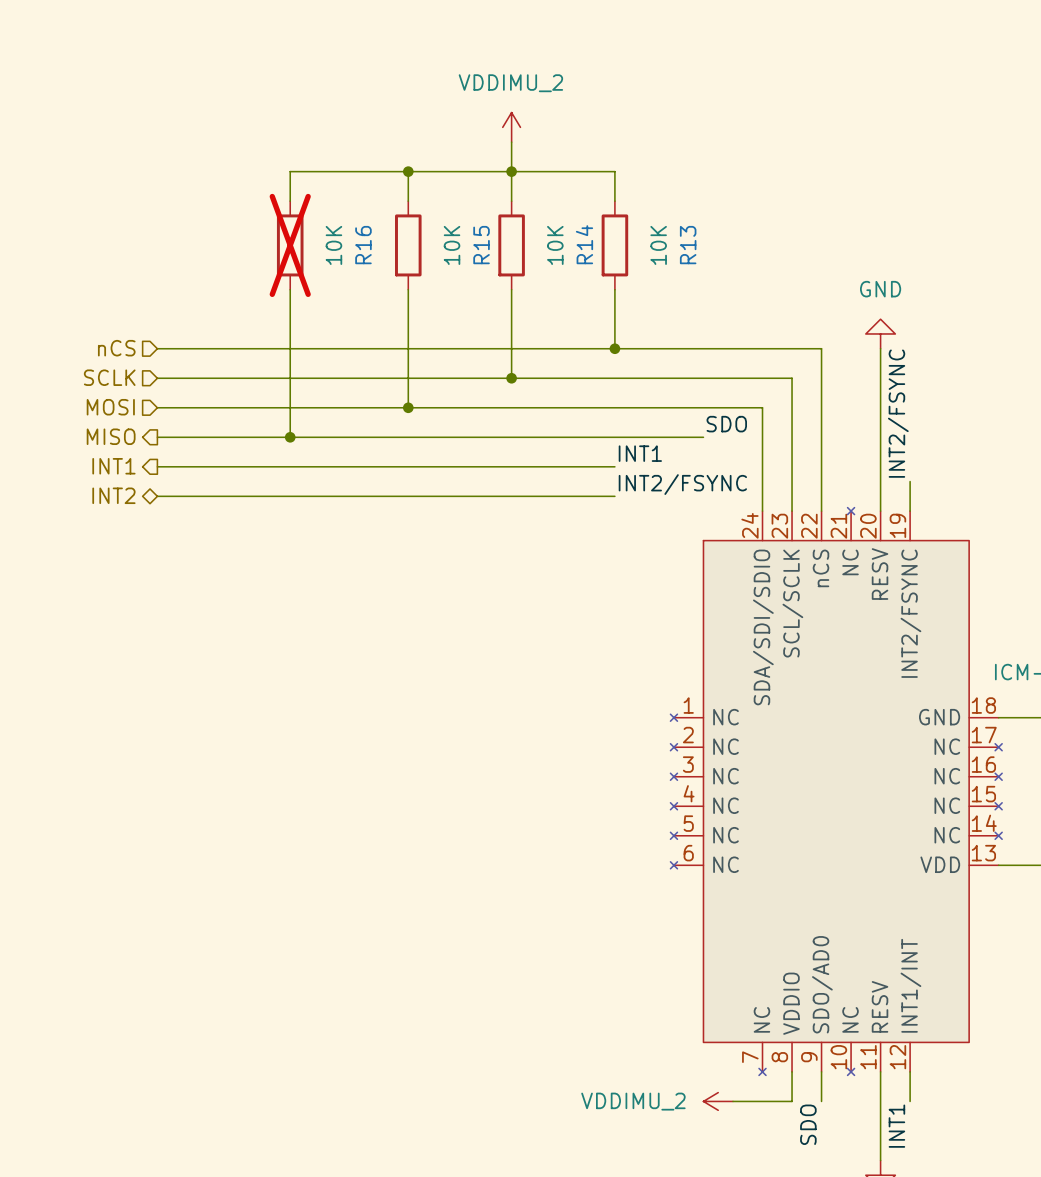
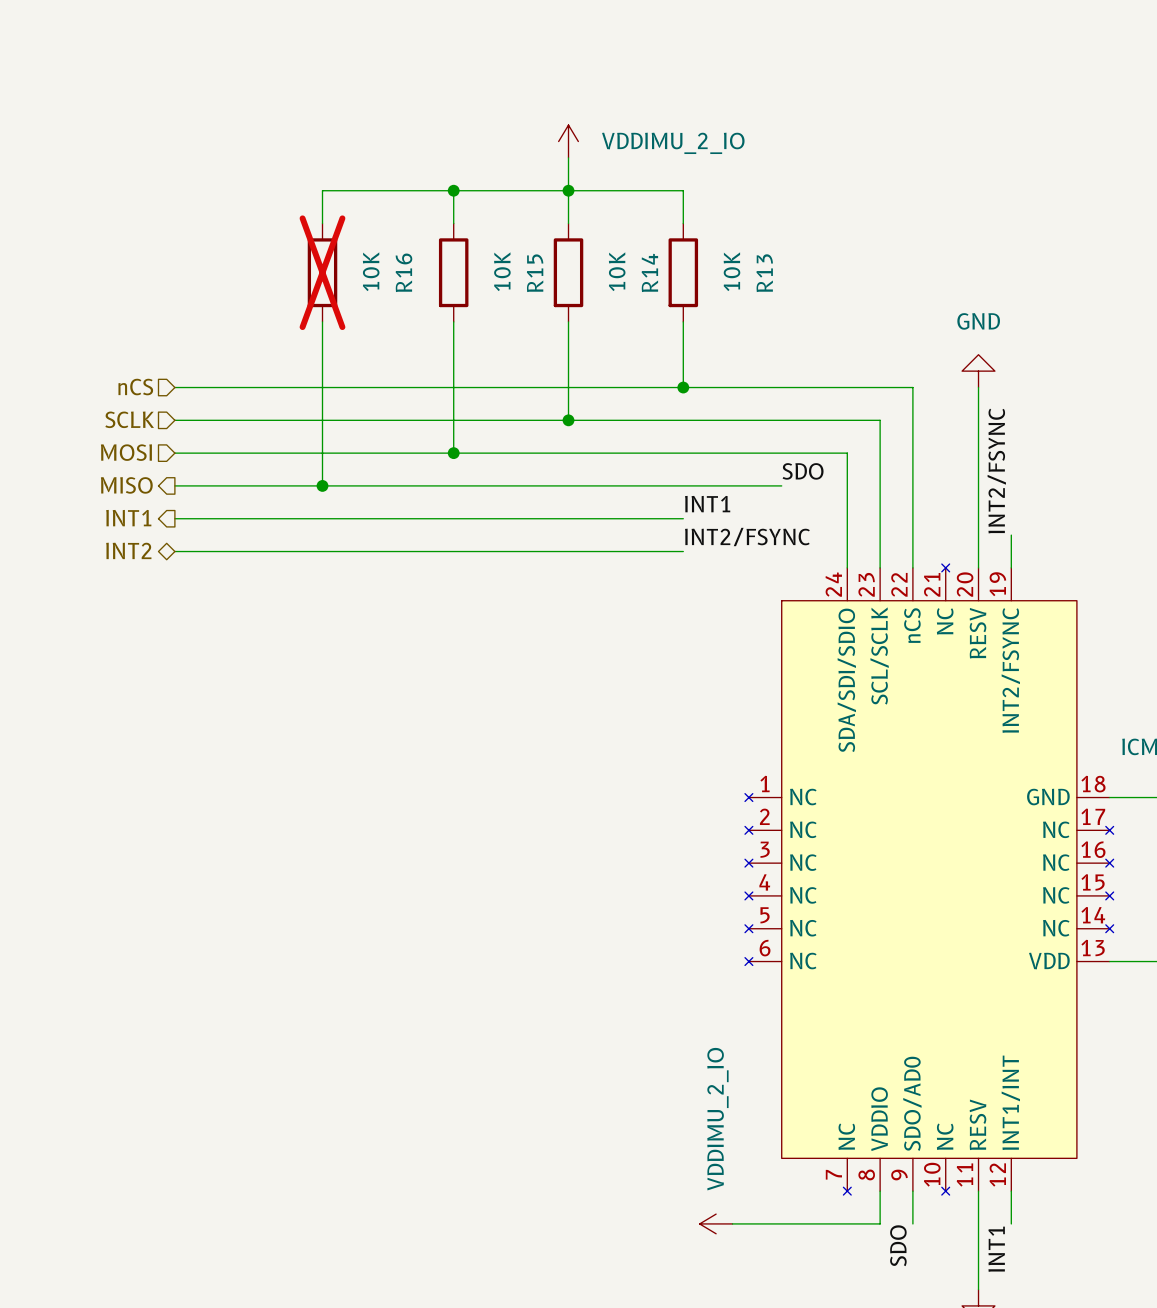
power symbol: VDDIMU_2 (511, 127) -> VDDIMU_2_IO (568, 141)
power symbol: none -> VDDIMU_2_IO (716, 1223)
wire: none -> (732, 1223) (814, 1223)
power symbol: VDDIMU_2 (718, 1101) -> none

